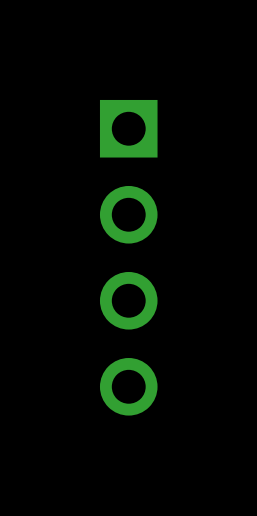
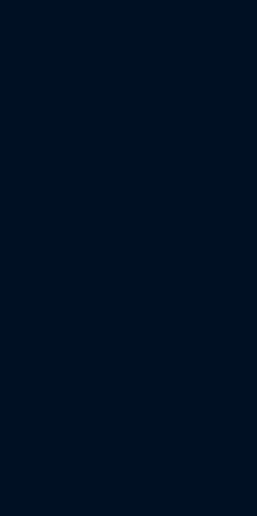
part: (128, 257) -> none

